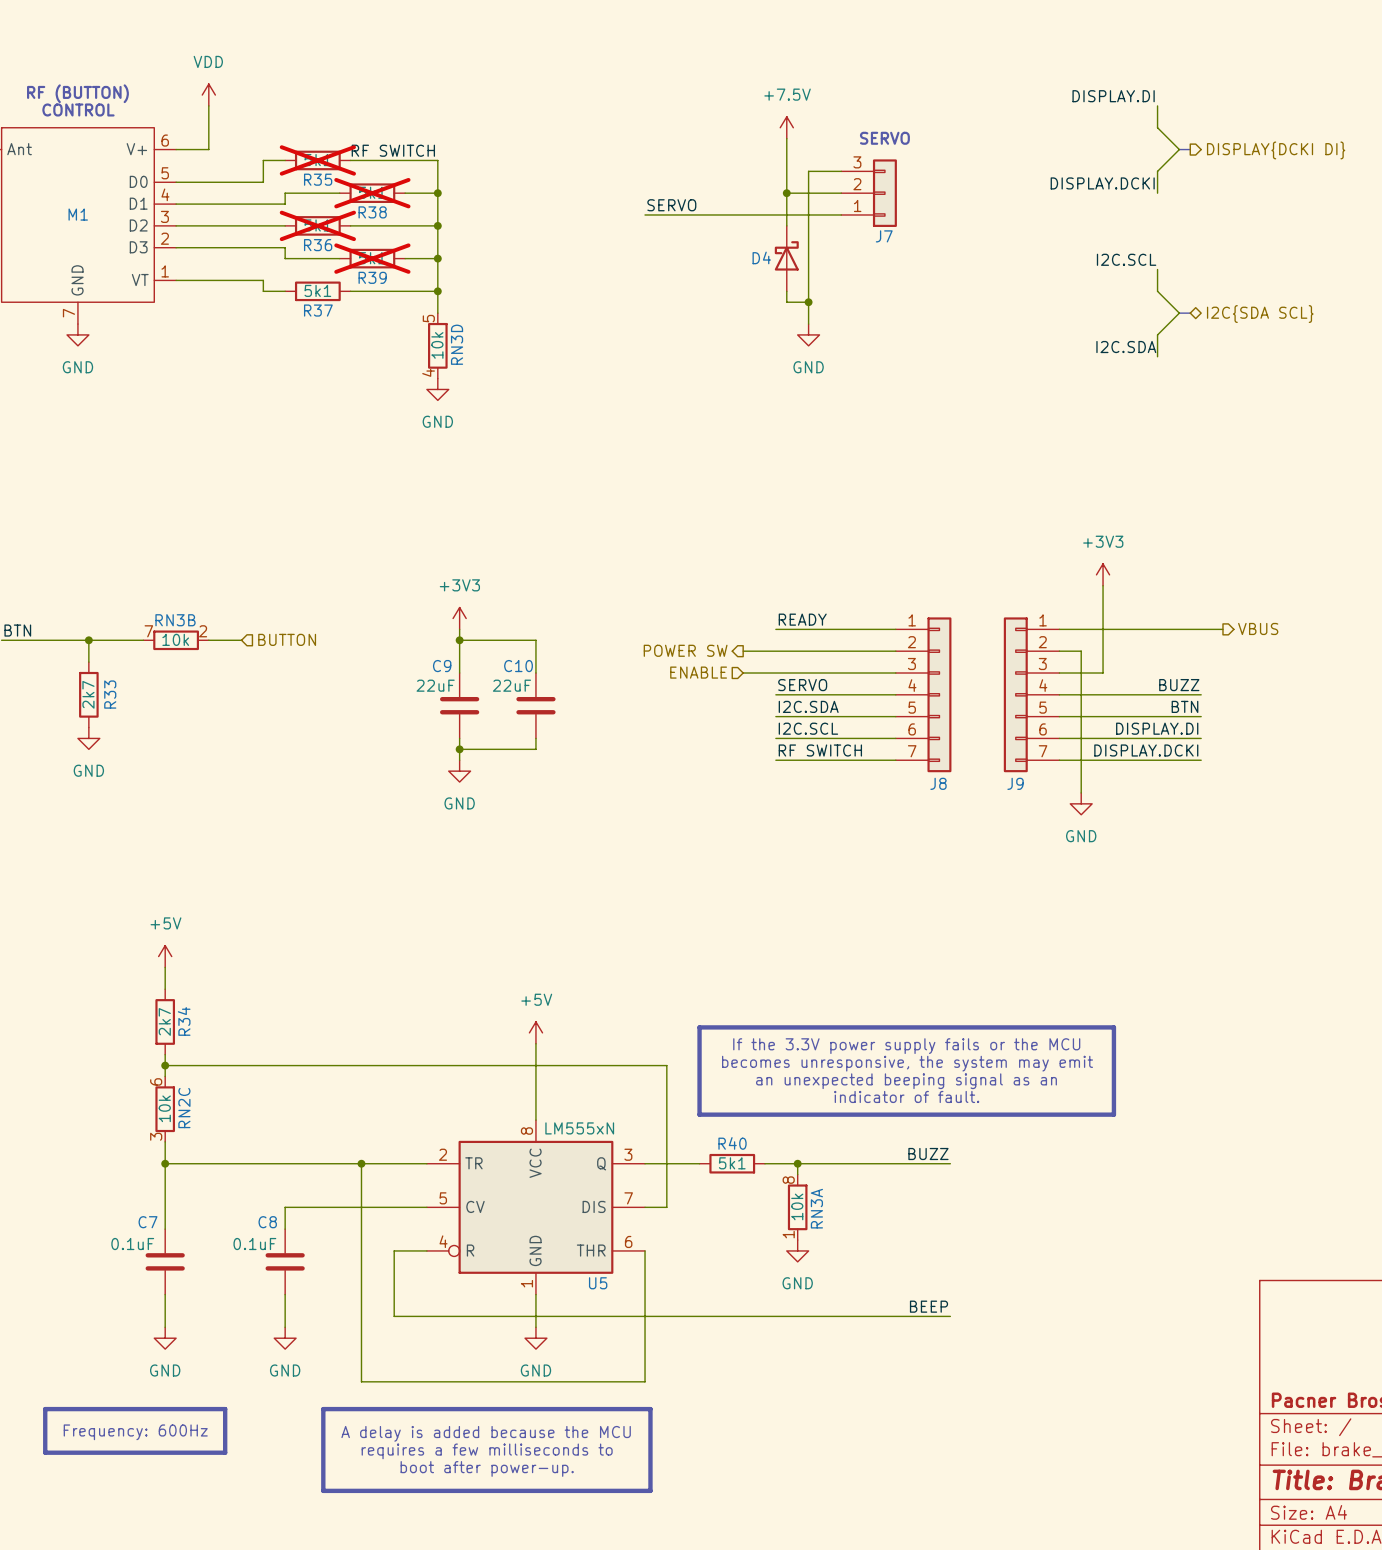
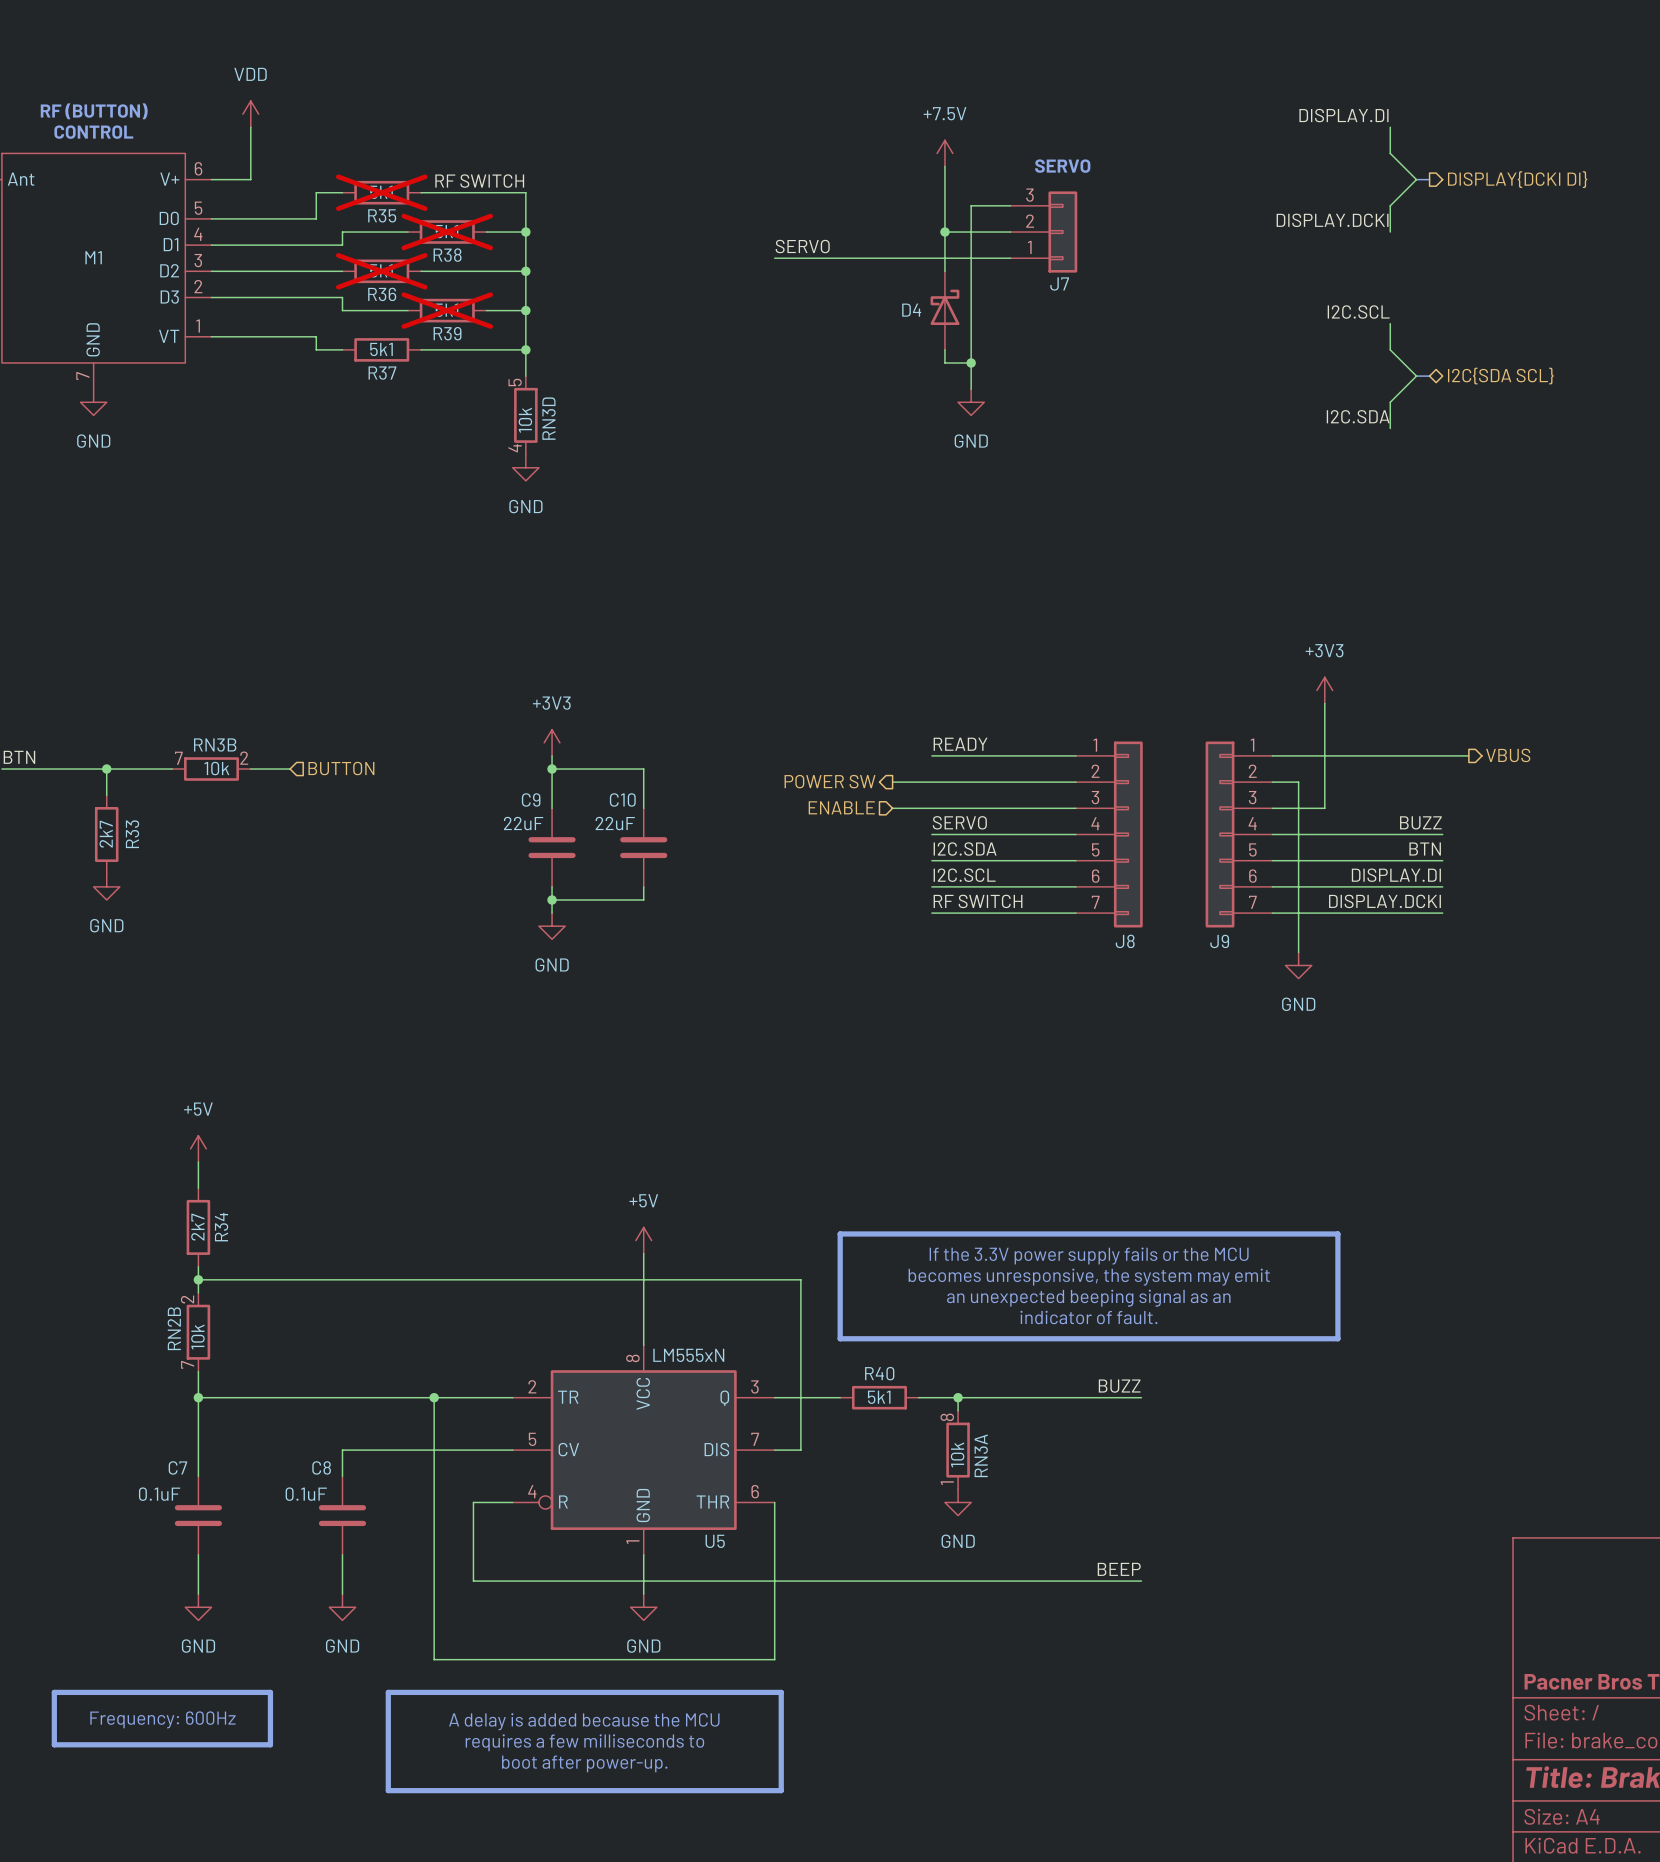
RN2C pin number: 6 (156, 1081) -> 2 (187, 1299)
RN2C name: RN2C (184, 1108) -> RN2B (174, 1328)
RN2C pin number: 3 (156, 1136) -> 7 (187, 1364)

